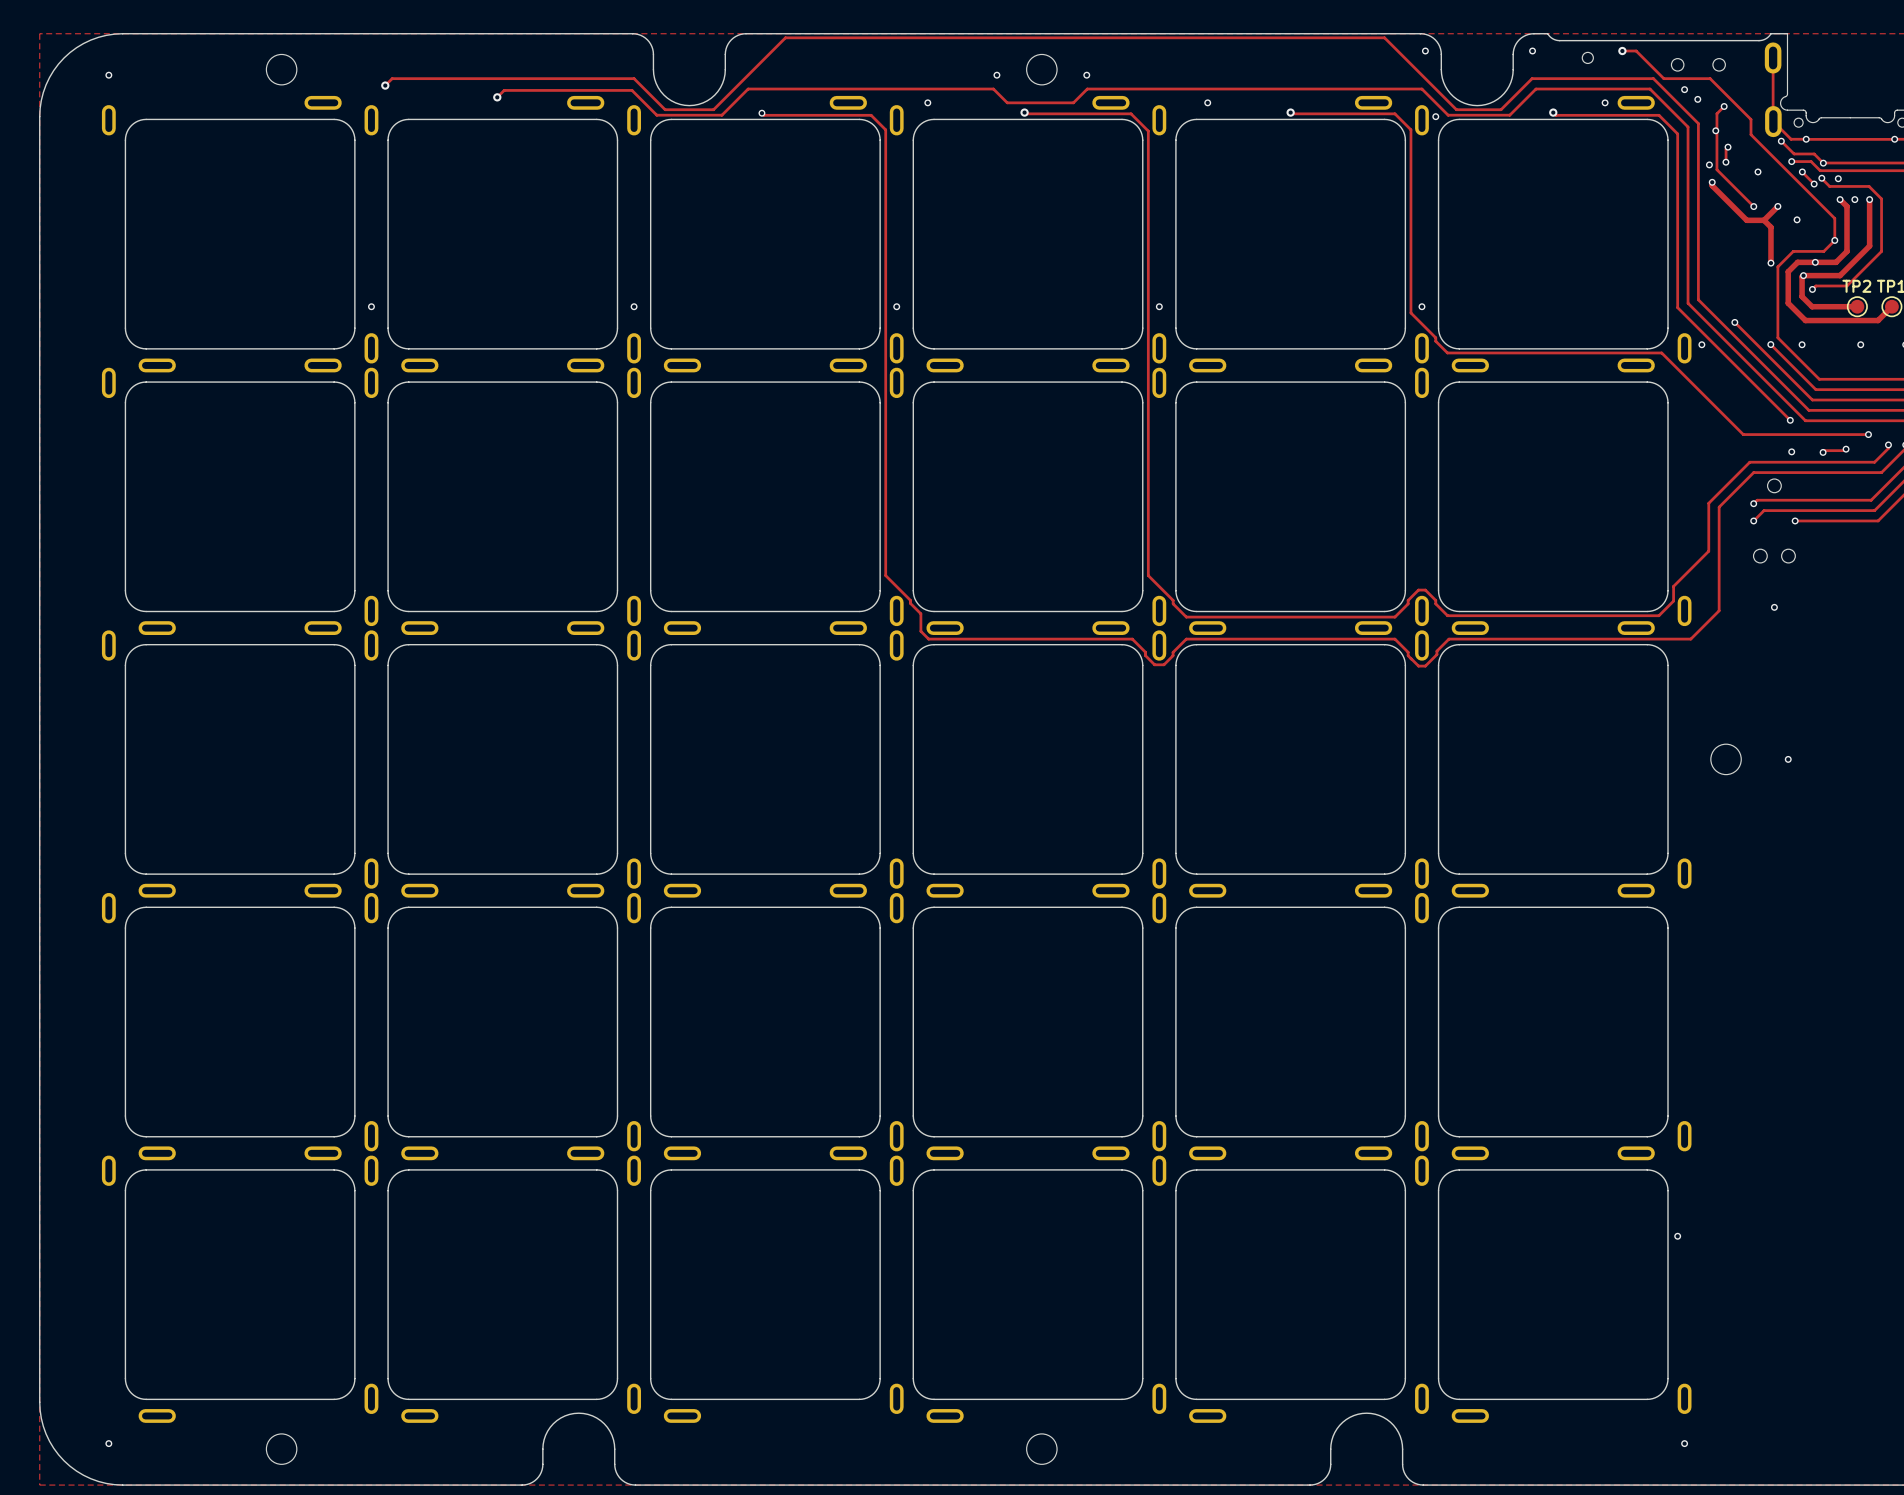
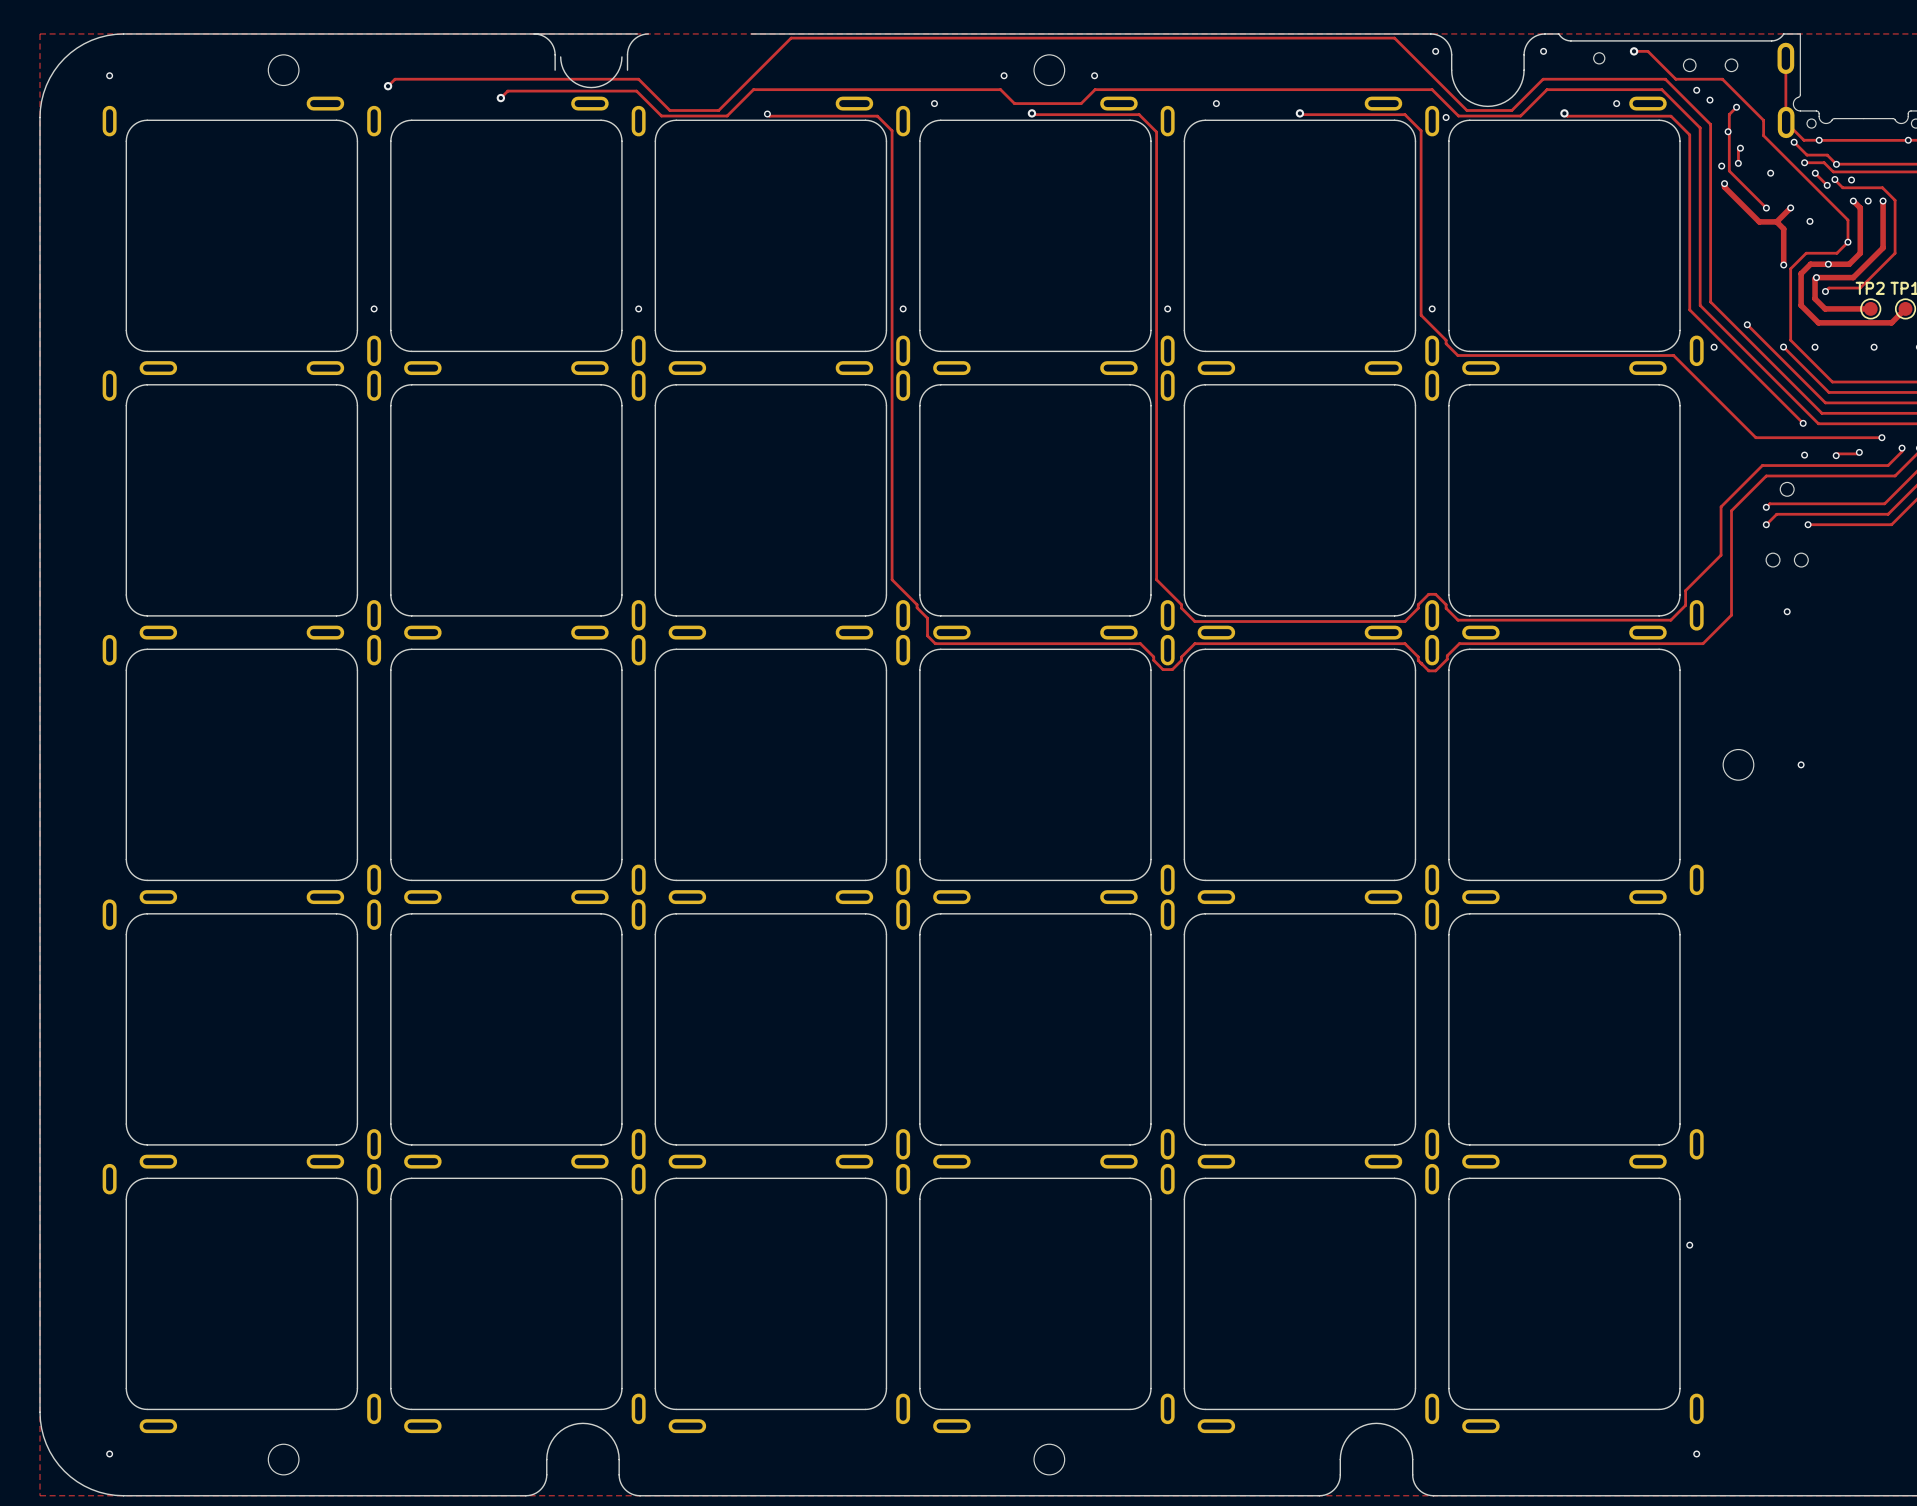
board edge: none -> (534, 33) (544, 36) (552, 44) (554, 52) (555, 70)
board edge: (632, 33) (643, 36) (651, 46) (654, 78) (660, 91) (671, 100) (689, 105) (707, 100) (717, 91) (724, 78) (726, 46) (735, 36) (746, 33) -> none
board edge: none -> (648, 33) (637, 36) (630, 44) (627, 52) (627, 70)
board edge: none -> (560, 56) (563, 68) (569, 78) (579, 85) (591, 87) (603, 85) (612, 78) (619, 68) (621, 56)

